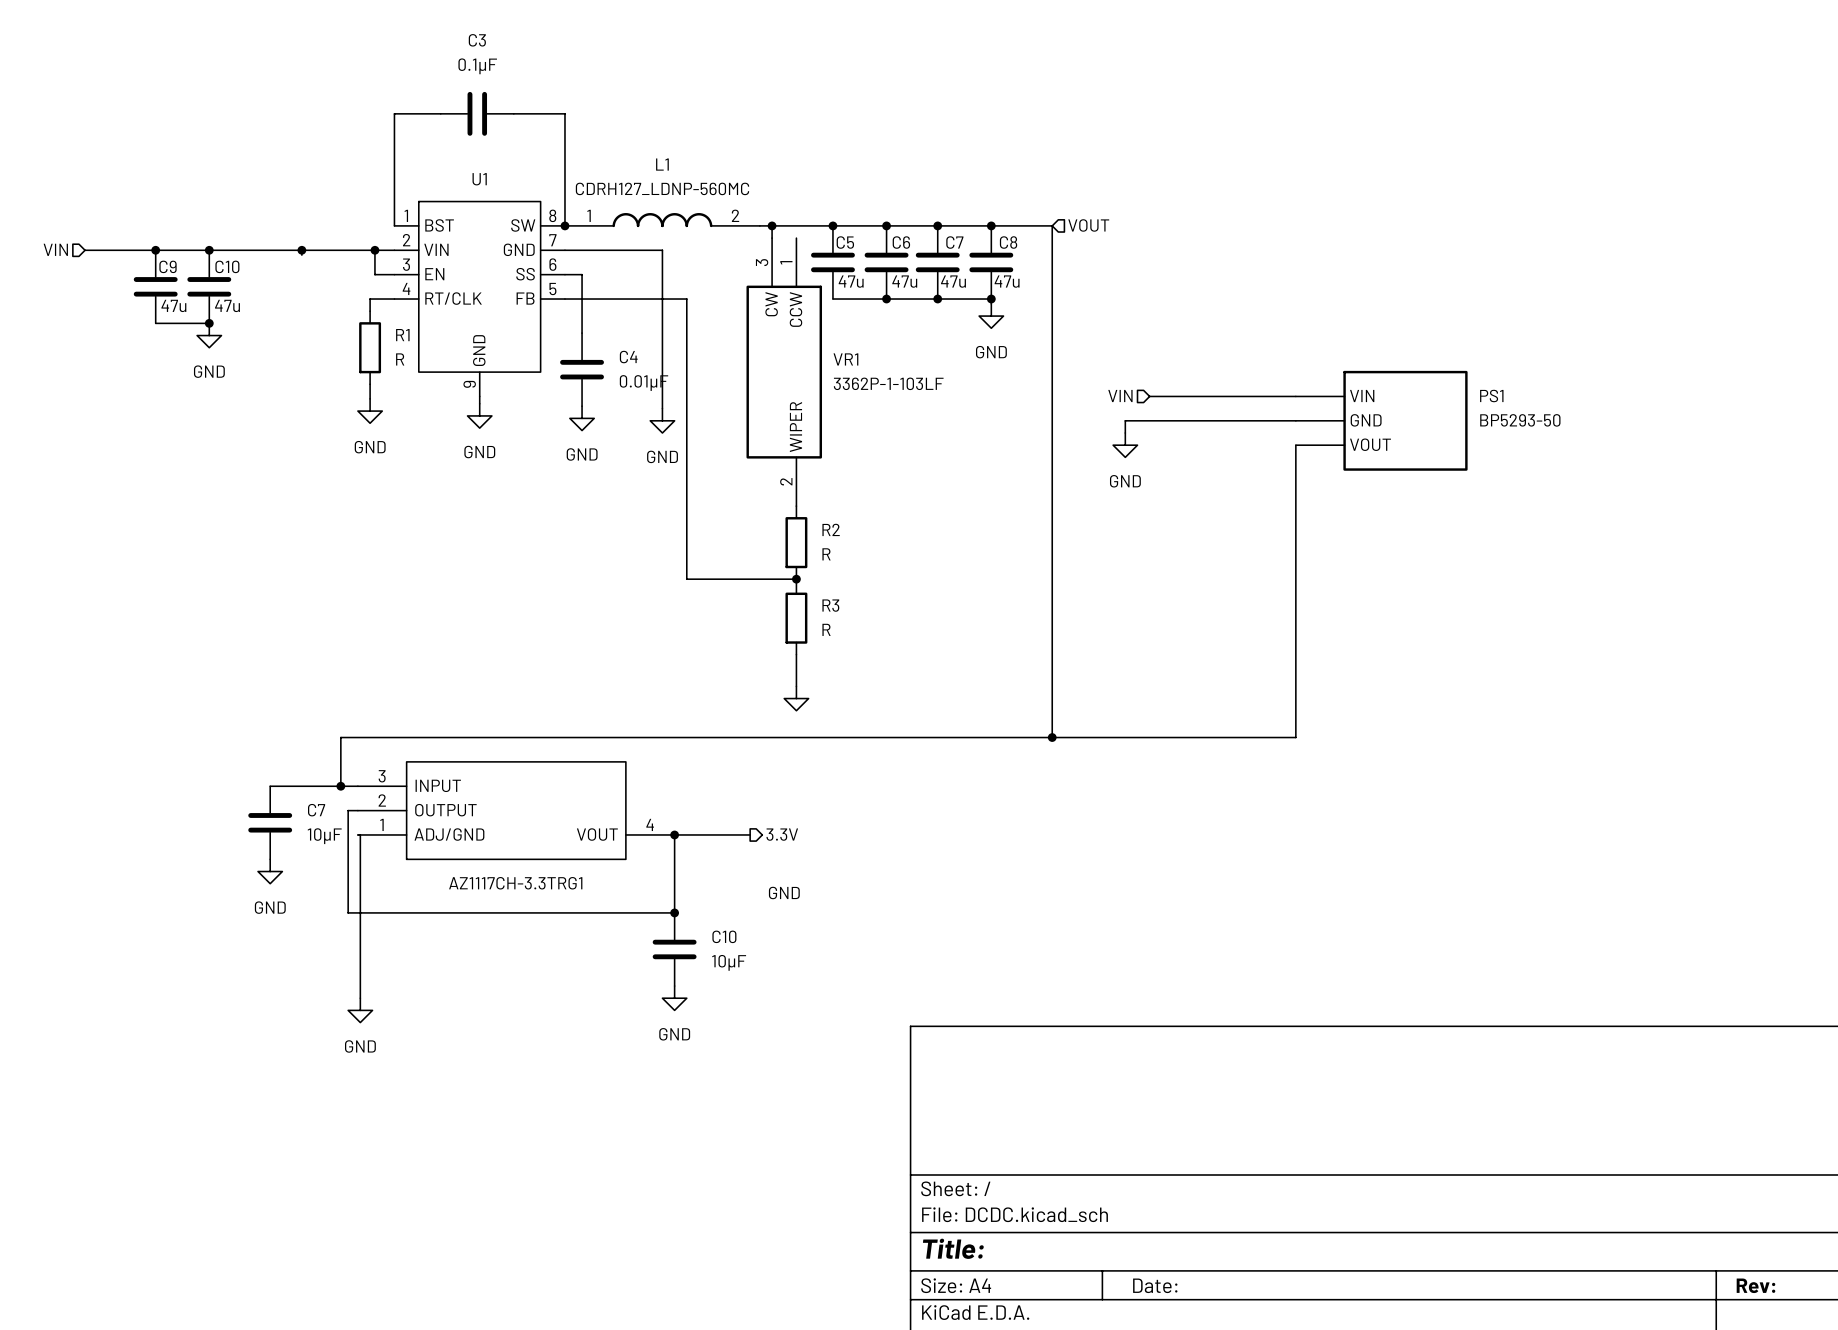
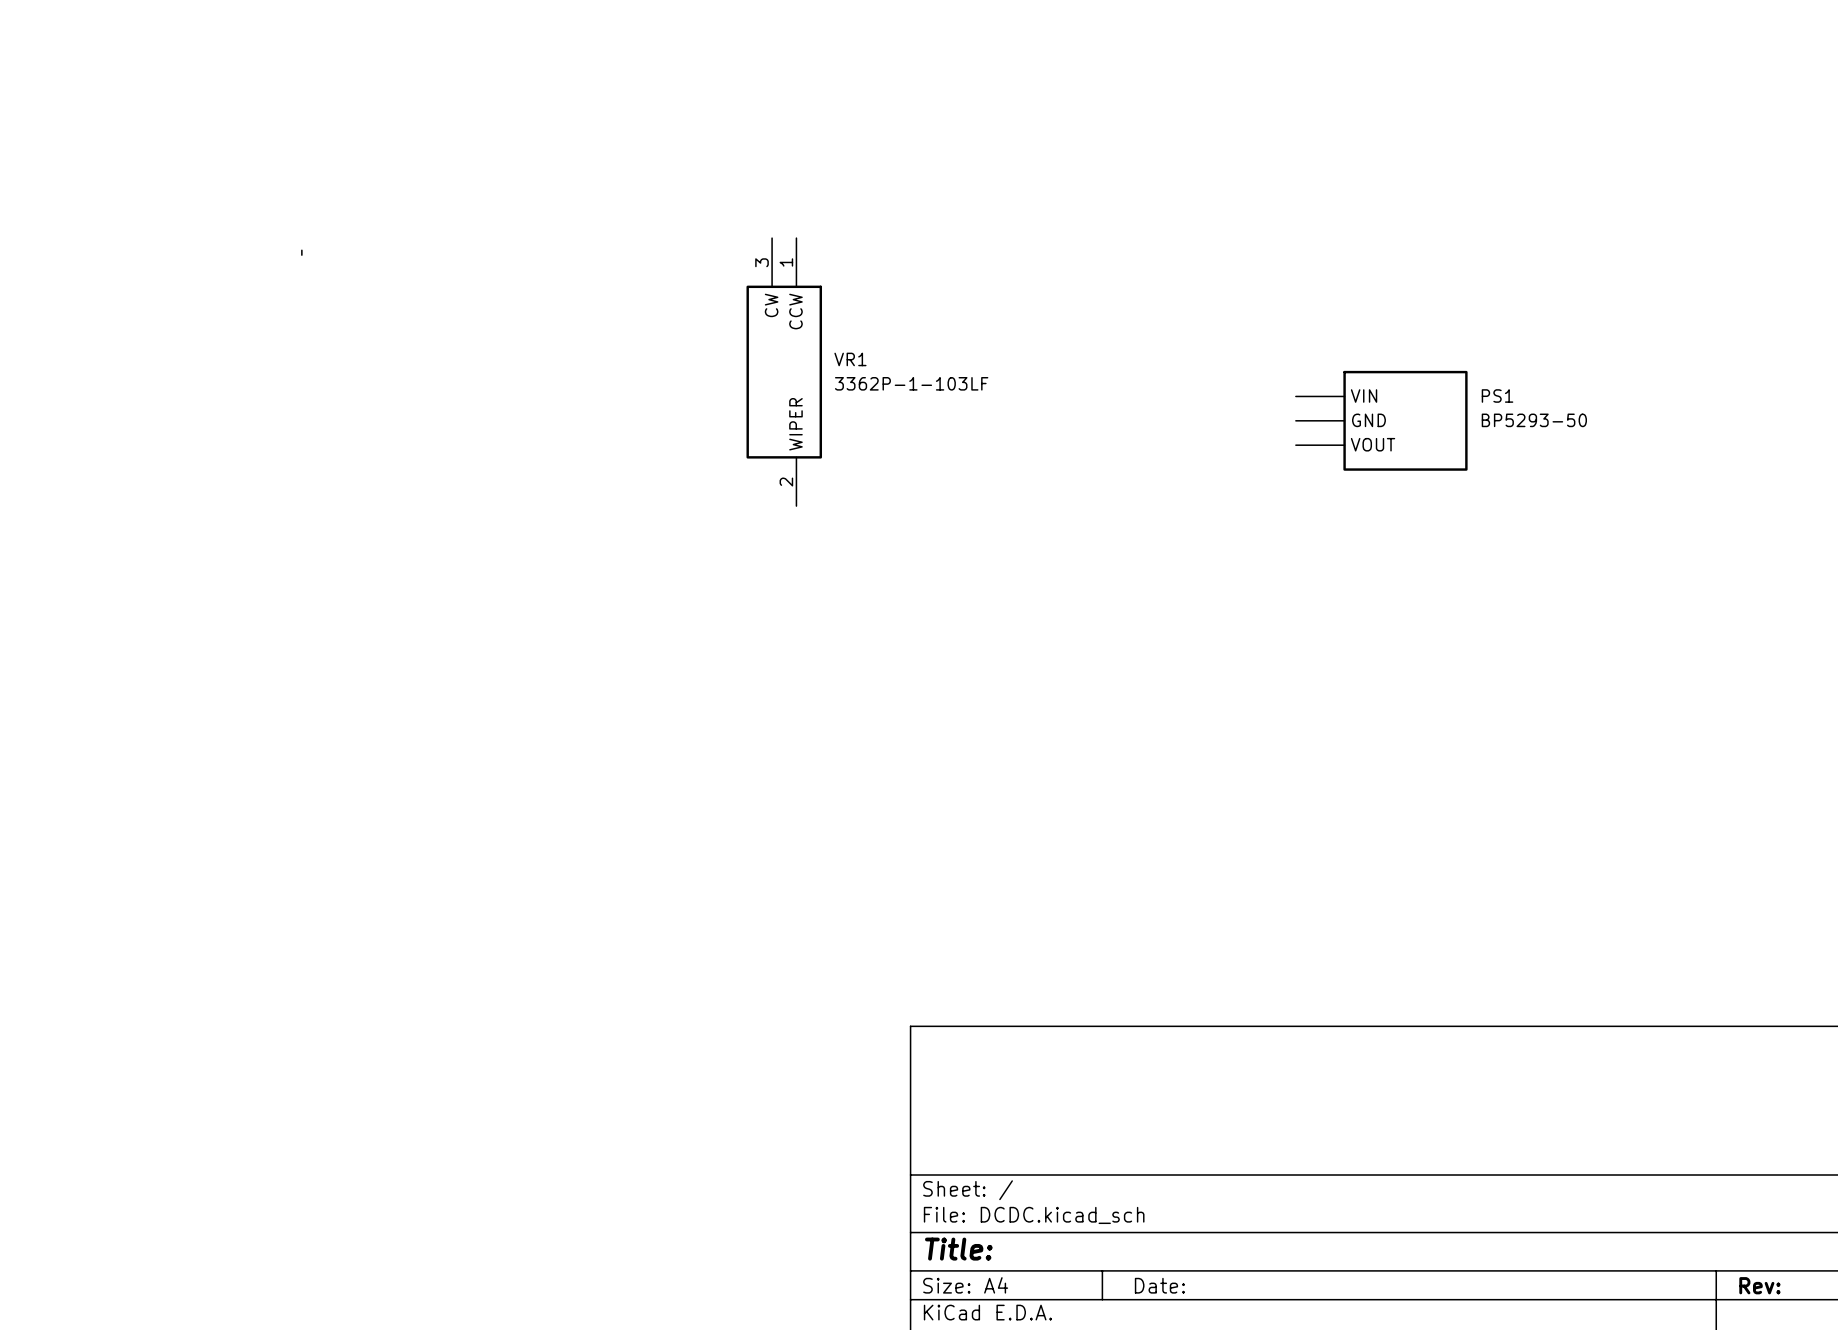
wire: (440, 113) (394, 113) (394, 225) -> none
C3: 0.1μF (477, 113) -> none
wire: (513, 113) (564, 113) (564, 225) -> none
L1: CDRH127_LDNP-560MC (662, 220) -> none
junction: (564, 225) -> none
wire: (759, 225) (1052, 225) (1052, 737) -> none
wire: (772, 225) (772, 238) -> none
junction: (772, 225) -> none
junction: (832, 225) -> none
junction: (886, 225) -> none
junction: (937, 225) -> none
junction: (991, 225) -> none
hierarchical label: VOUT (1088, 225) -> none
hierarchical label: VIN (55, 249) -> none
wire: (85, 250) (394, 250) -> none
junction: (155, 250) -> none
junction: (209, 250) -> none
junction: (301, 250) -> none
wire: (374, 250) (374, 274) (394, 274) -> none
junction: (374, 250) -> none
wire: (564, 250) (662, 250) (662, 408) -> none
C5: 47u (832, 262) -> none
C6: 47u (886, 262) -> none
C7: 47u (937, 262) -> none
C8: 47u (991, 262) -> none
wire: (564, 274) (582, 274) (582, 333) -> none
C9: 47u (155, 286) -> none
C10: 47u (209, 286) -> none
wire: (394, 299) (370, 299) (370, 311) -> none
U1: (479, 299) -> none
wire: (564, 299) (686, 299) (686, 579) (796, 579) (796, 581) -> none
wire: (832, 299) (991, 299) (991, 303) -> none
junction: (886, 299) -> none
junction: (937, 299) -> none
junction: (991, 299) -> none
power symbol: GND (991, 316) -> none
wire: (155, 323) (209, 323) -> none
junction: (209, 323) -> none
power symbol: GND (209, 335) -> none
R1: R (370, 347) -> none
C4: 0.01μF (582, 369) -> none
wire: (370, 384) (370, 398) -> none
wire: (479, 396) (479, 403) -> none
hierarchical label: VIN (1120, 396) -> none
wire: (1149, 396) (1295, 396) -> none
power symbol: GND (370, 411) -> none
power symbol: GND (479, 415) -> none
power symbol: GND (582, 418) -> none
power symbol: GND (662, 420) -> none
wire: (1295, 420) (1125, 420) (1125, 433) -> none
power symbol: GND (1125, 445) -> none
wire: (1295, 445) (1295, 737) (340, 737) (340, 786) -> none
R2: R (796, 542) -> none
junction: (796, 579) -> none
R3: R (796, 618) -> none
wire: (796, 654) (796, 686) -> none
power symbol: GND (796, 698) -> none
junction: (1052, 737) -> none
wire: (270, 786) (357, 786) -> none
junction: (340, 786) -> none
wire: (357, 810) (348, 810) (348, 912) (674, 912) (674, 834) (750, 834) -> none
part: AZ1117CH-3.3TRG1 (516, 810) -> none
C7: 10µF (270, 822) -> none
wire: (357, 834) (360, 834) (360, 998) -> none
junction: (674, 834) -> none
hierarchical label: 3.3V (782, 834) -> none
power symbol: GND (270, 871) -> none
junction: (674, 912) -> none
C10: 10µF (674, 949) -> none
power symbol: GND (674, 998) -> none
power symbol: GND (360, 1010) -> none

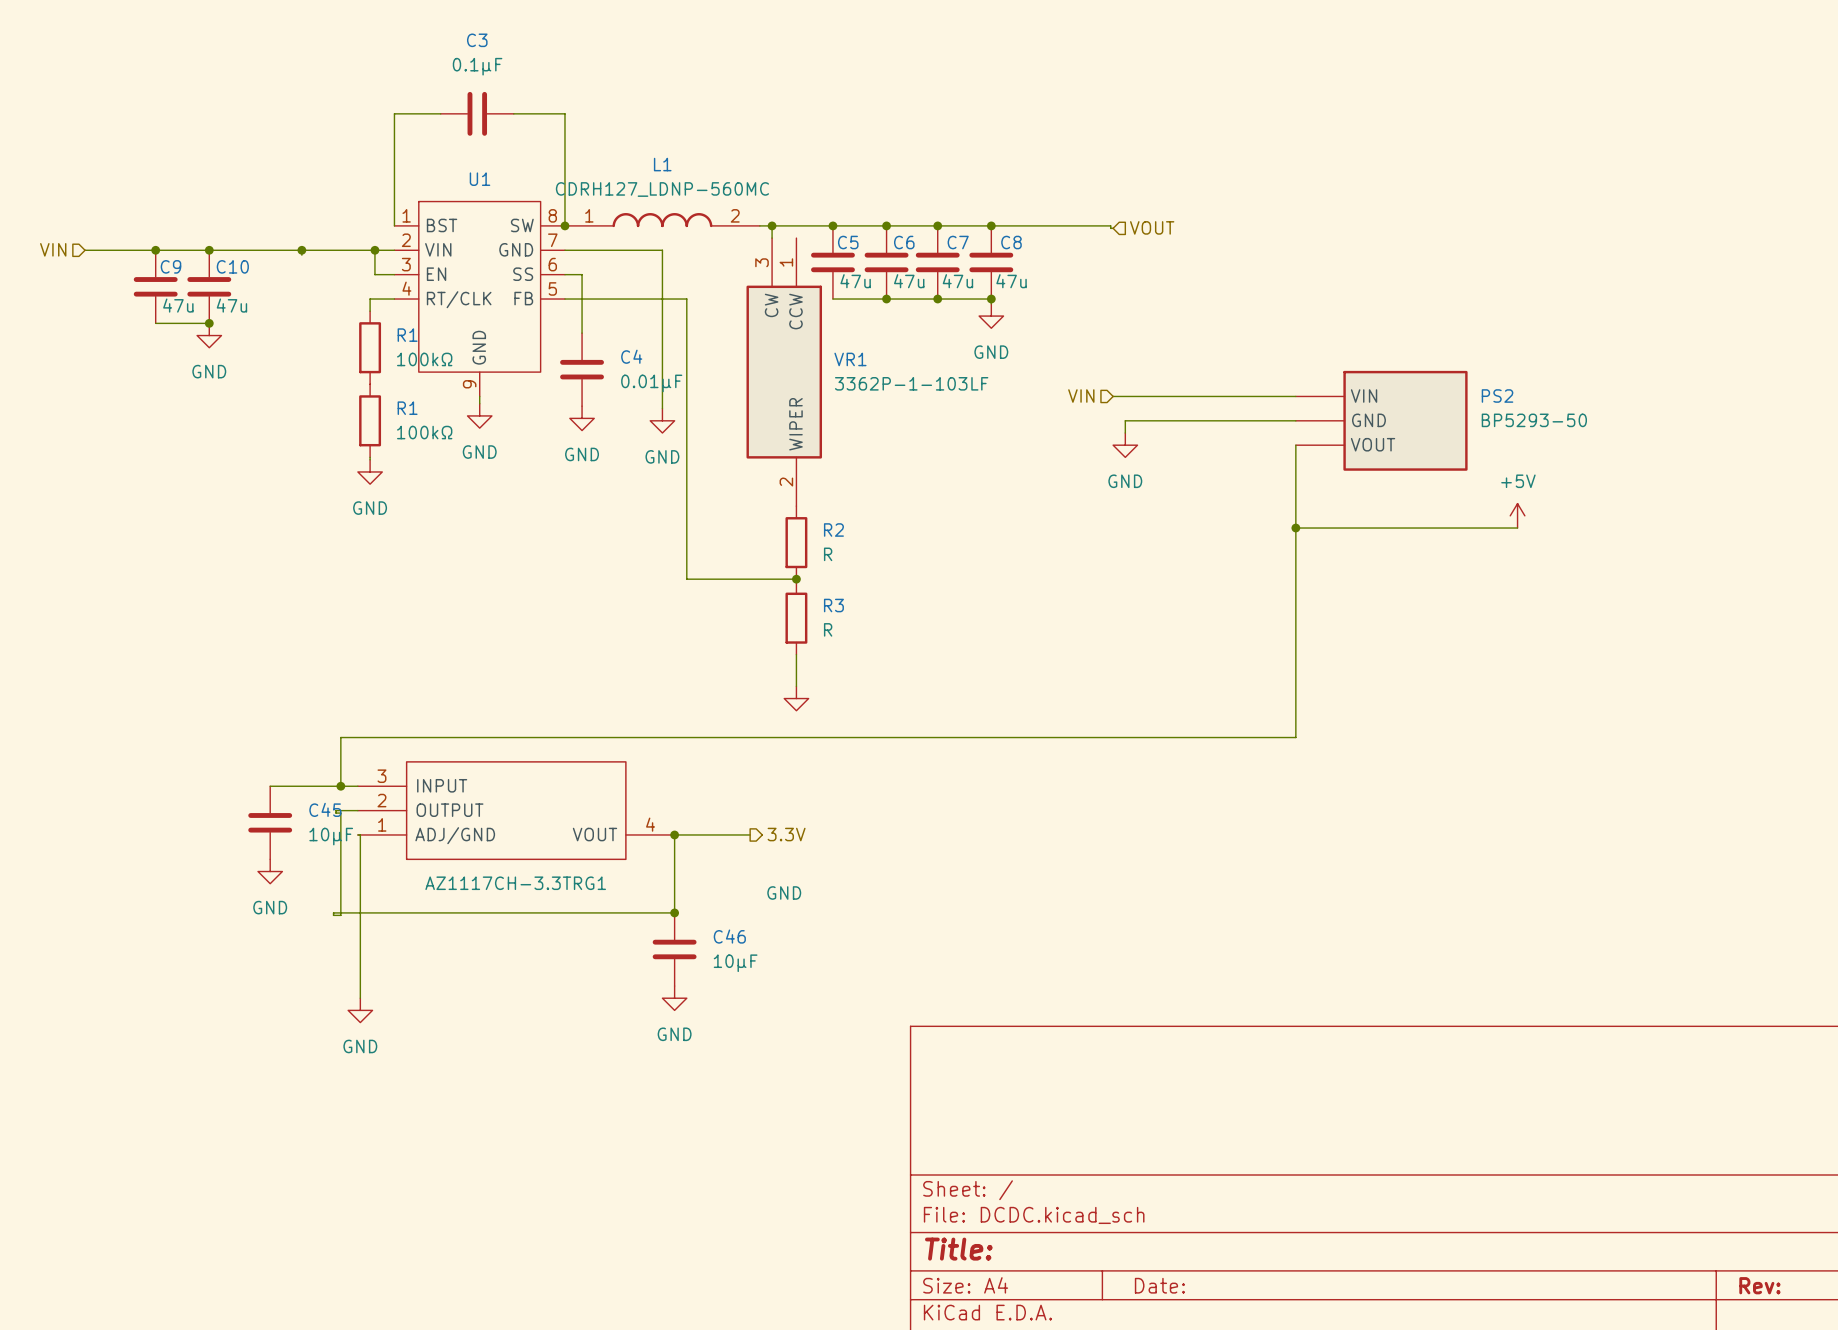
wire: none -> (440, 113) (394, 113) (394, 225)
C3: none -> 0.1μF (477, 113)
wire: none -> (513, 113) (564, 113) (564, 225)
L1: none -> CDRH127_LDNP-560MC (662, 220)
junction: none -> (564, 225)
wire: none -> (759, 225) (1110, 225) (1110, 228) (1113, 228)
wire: none -> (772, 225) (772, 238)
junction: none -> (772, 225)
junction: none -> (832, 225)
junction: none -> (886, 225)
junction: none -> (937, 225)
junction: none -> (991, 225)
hierarchical label: none -> VOUT (1152, 227)
hierarchical label: none -> VIN (53, 249)
wire: none -> (85, 250) (394, 250)
junction: none -> (155, 250)
junction: none -> (209, 250)
junction: none -> (301, 250)
wire: none -> (374, 250) (374, 274) (394, 274)
junction: none -> (374, 250)
wire: none -> (564, 250) (662, 250) (662, 408)
C5: none -> 47u (832, 262)
C6: none -> 47u (886, 262)
C7: none -> 47u (937, 262)
C8: none -> 47u (991, 262)
wire: none -> (564, 274) (582, 274) (582, 333)
C9: none -> 47u (155, 286)
C10: none -> 47u (209, 286)
wire: none -> (394, 299) (370, 299) (370, 311)
U1: none -> (479, 299)
wire: none -> (564, 299) (686, 299) (686, 579) (796, 579) (796, 581)
wire: none -> (832, 299) (991, 299) (991, 303)
junction: none -> (886, 299)
junction: none -> (937, 299)
junction: none -> (991, 299)
power symbol: none -> GND (991, 316)
wire: none -> (155, 323) (209, 323)
junction: none -> (209, 323)
power symbol: none -> GND (209, 335)
R1: none -> 100kΩ (370, 347)
C4: none -> 0.01μF (582, 369)
wire: none -> (479, 396) (479, 403)
hierarchical label: none -> VIN (1081, 396)
wire: none -> (1113, 396) (1295, 396)
PS1 name: PS1 (1497, 396) -> PS2 (1497, 396)
power symbol: none -> GND (479, 415)
power symbol: none -> GND (582, 418)
R1: none -> 100kΩ (370, 420)
power symbol: none -> GND (662, 420)
wire: none -> (1295, 420) (1125, 420) (1125, 433)
power symbol: none -> GND (1125, 445)
wire: none -> (1295, 445) (1295, 737) (340, 737) (340, 786)
wire: none -> (370, 457) (370, 459)
power symbol: none -> GND (370, 471)
power symbol: none -> +5V (1517, 515)
wire: none -> (1295, 528) (1517, 528)
junction: none -> (1295, 528)
R2: none -> R (796, 542)
junction: none -> (796, 579)
R3: none -> R (796, 618)
wire: none -> (796, 654) (796, 686)
power symbol: none -> GND (796, 698)
wire: none -> (270, 786) (357, 786)
junction: none -> (340, 786)
wire: none -> (357, 810) (335, 810) (335, 813) (340, 813) (340, 915) (333, 915) (333, 912) (674, 912) (674, 834) (750, 834)
part: none -> AZ1117CH-3.3TRG1 (516, 810)
C45: none -> 10µF (270, 822)
wire: none -> (357, 834) (360, 834) (360, 998)
junction: none -> (674, 834)
hierarchical label: none -> 3.3V (786, 834)
power symbol: none -> GND (270, 871)
junction: none -> (674, 912)
C46: none -> 10µF (674, 949)
power symbol: none -> GND (674, 998)
power symbol: none -> GND (360, 1010)

